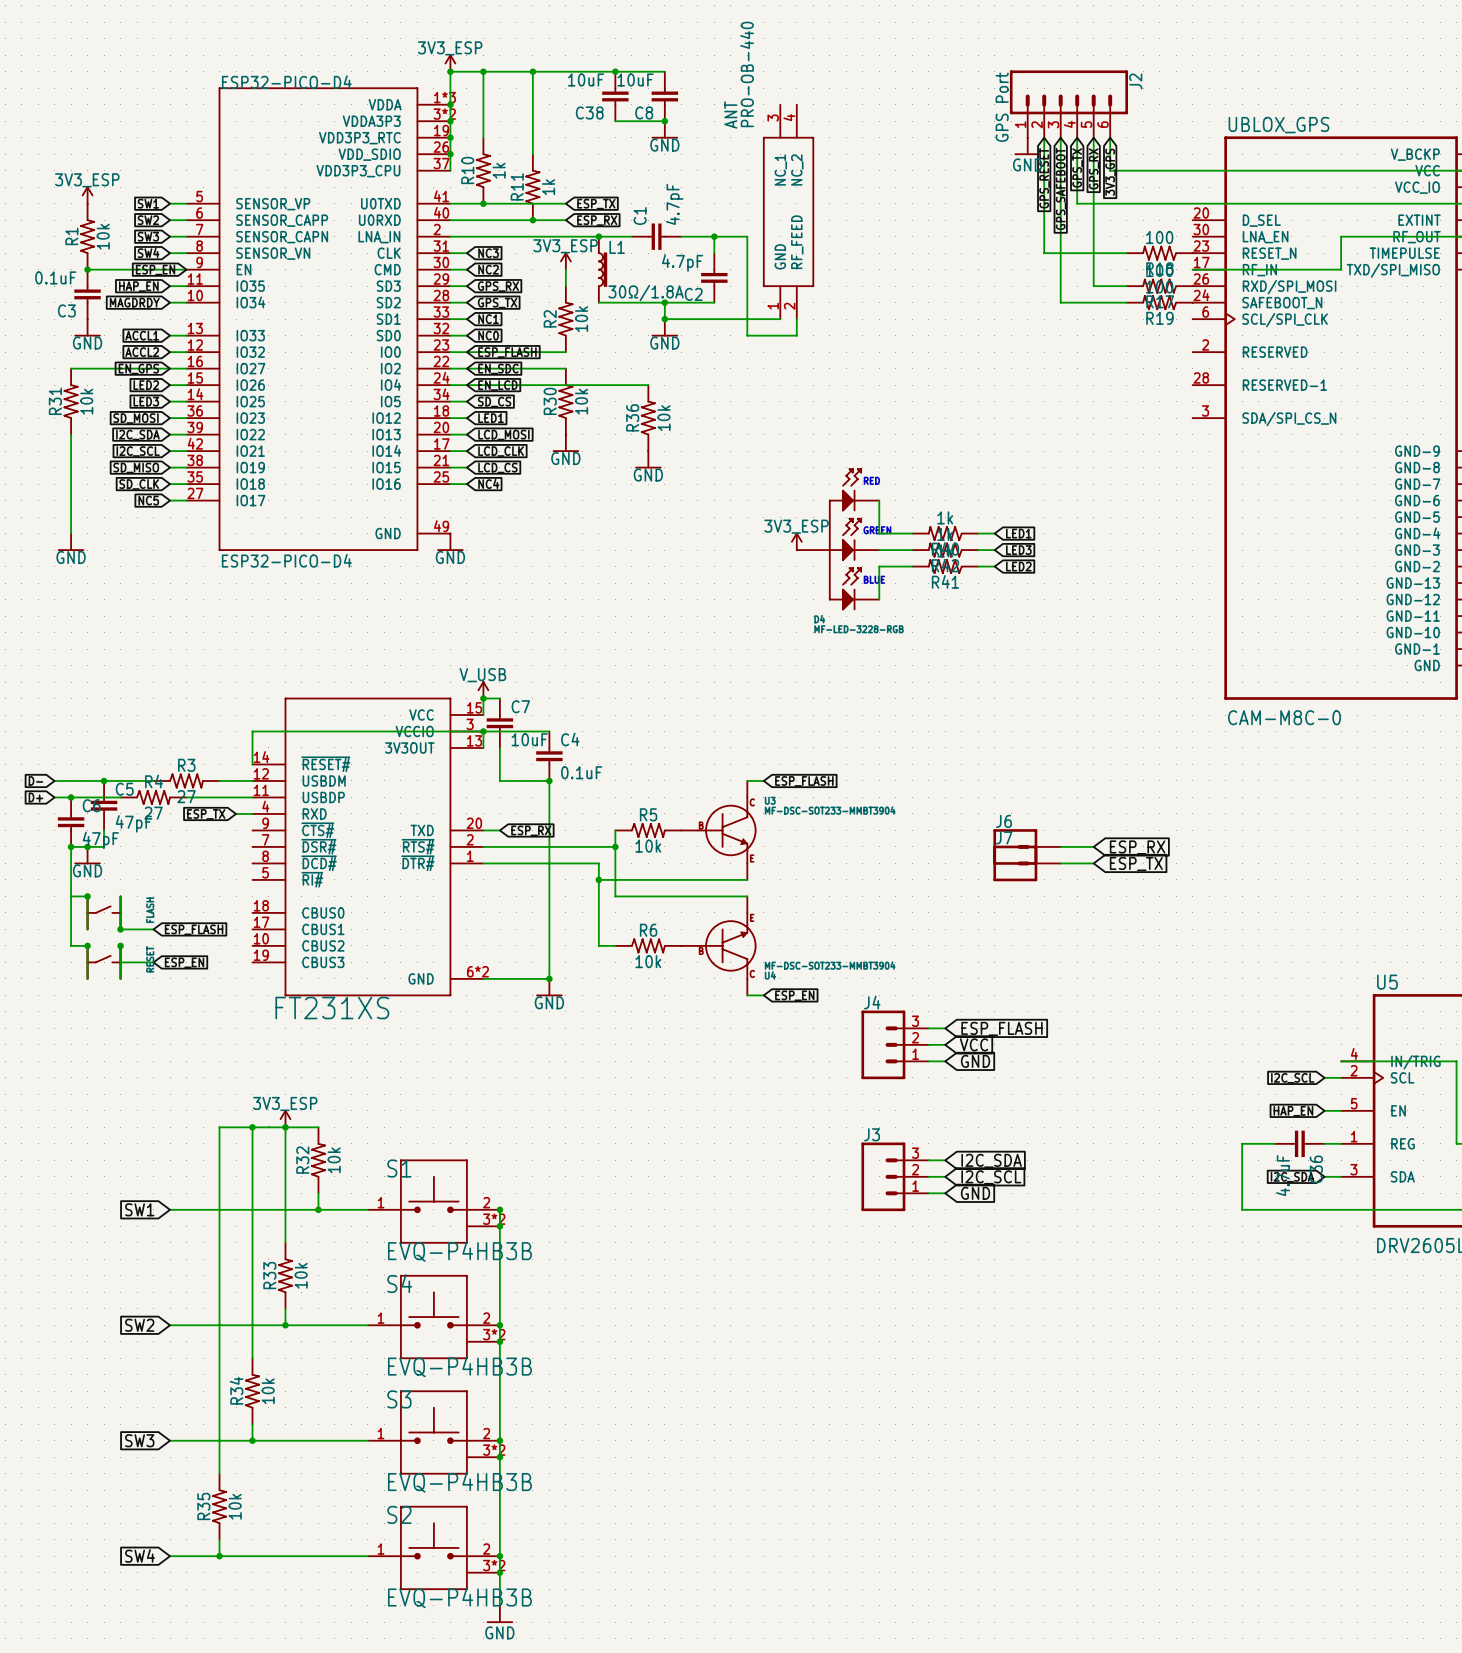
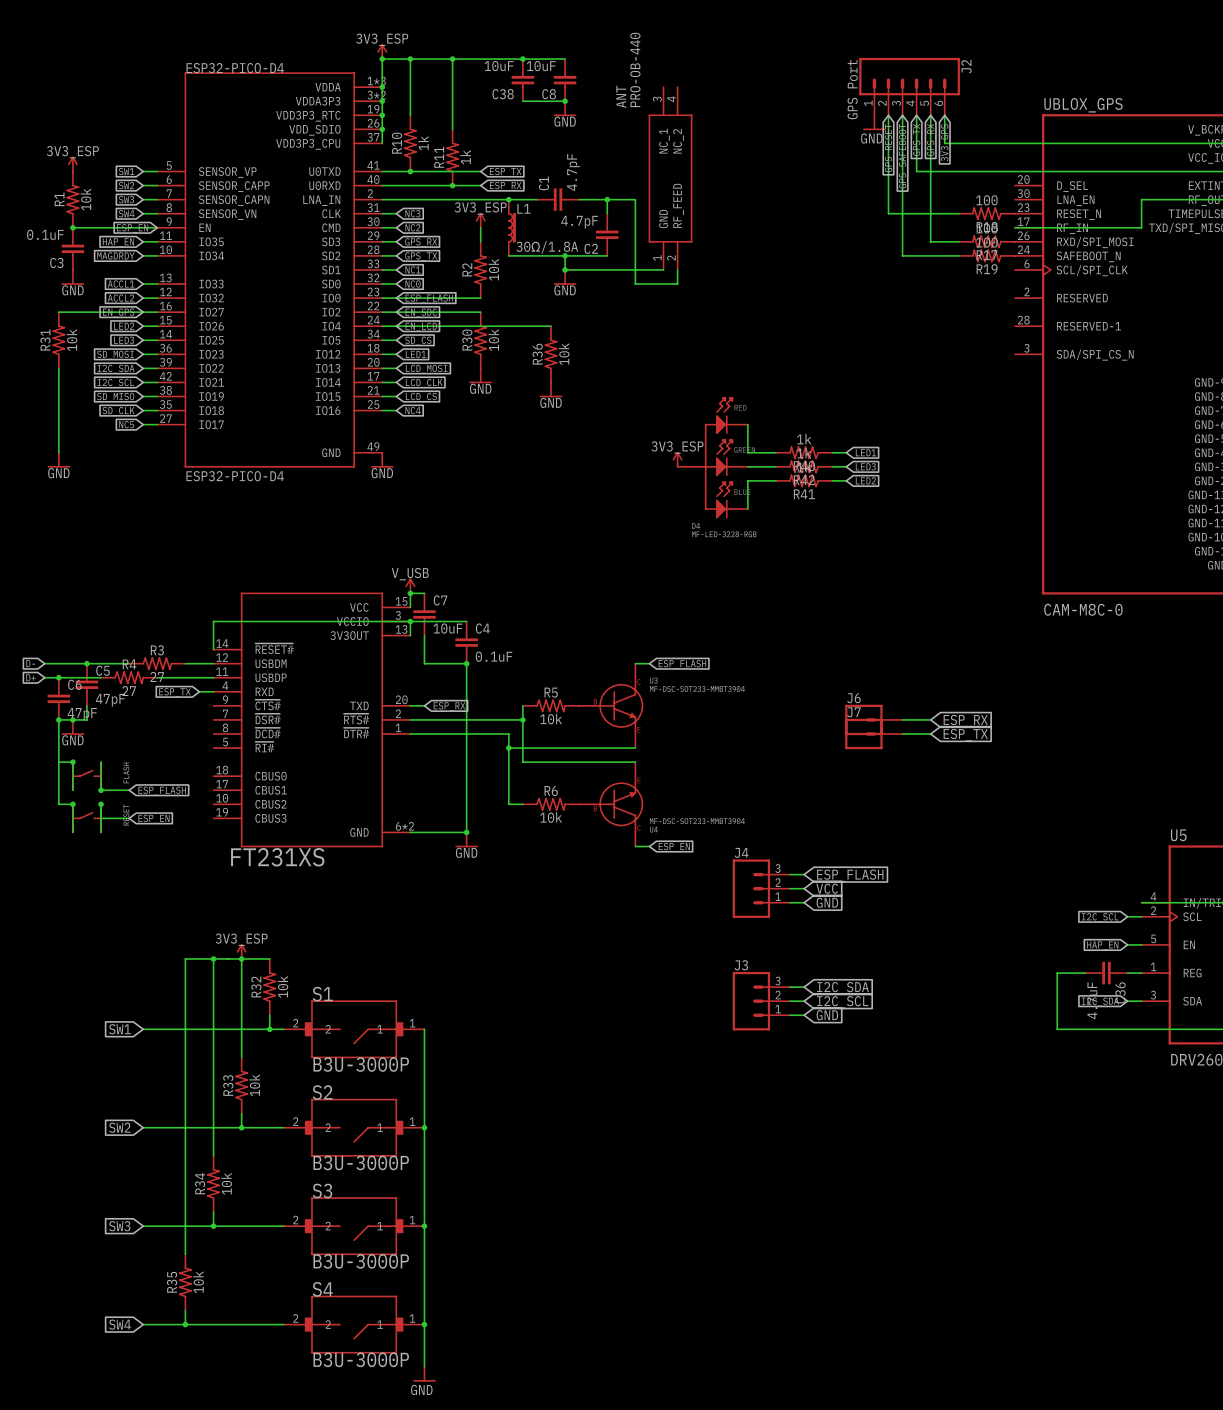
S1 symbol: [367, 1159, 500, 1244] -> [283, 1000, 425, 1059]
junction: (499, 1209) -> none
junction: (499, 1226) -> none
S1 value: EVQ-P4HB3B (459, 1251) -> B3U-3000P (361, 1064)
S4 symbol: [367, 1274, 500, 1360] -> [283, 1295, 425, 1354]
junction: (499, 1341) -> none
S4 value: EVQ-P4HB3B (459, 1366) -> B3U-3000P (361, 1359)
S3 symbol: [367, 1390, 500, 1475] -> [283, 1197, 425, 1255]
junction: (499, 1457) -> none
S3 value: EVQ-P4HB3B (459, 1482) -> B3U-3000P (361, 1261)
S2 symbol: [367, 1505, 500, 1591] -> [283, 1098, 425, 1157]
junction: (499, 1572) -> none
S2 value: EVQ-P4HB3B (459, 1597) -> B3U-3000P (361, 1162)

